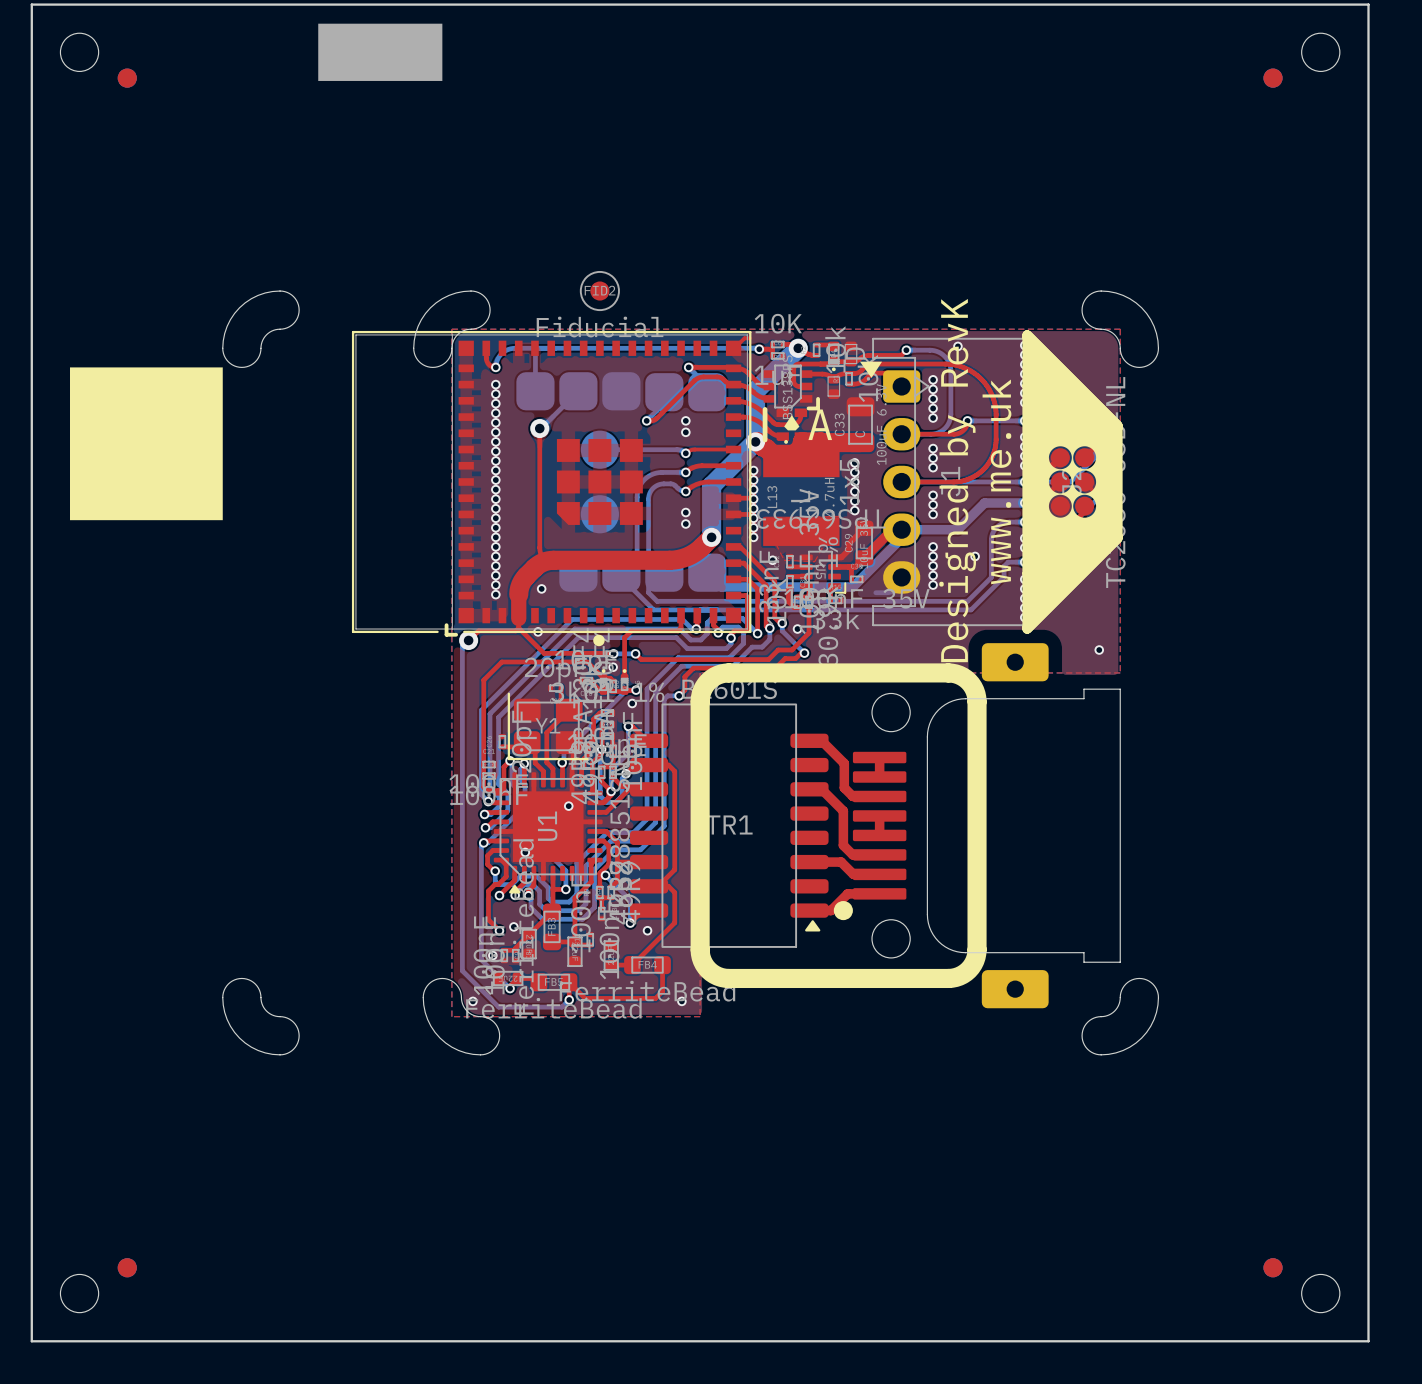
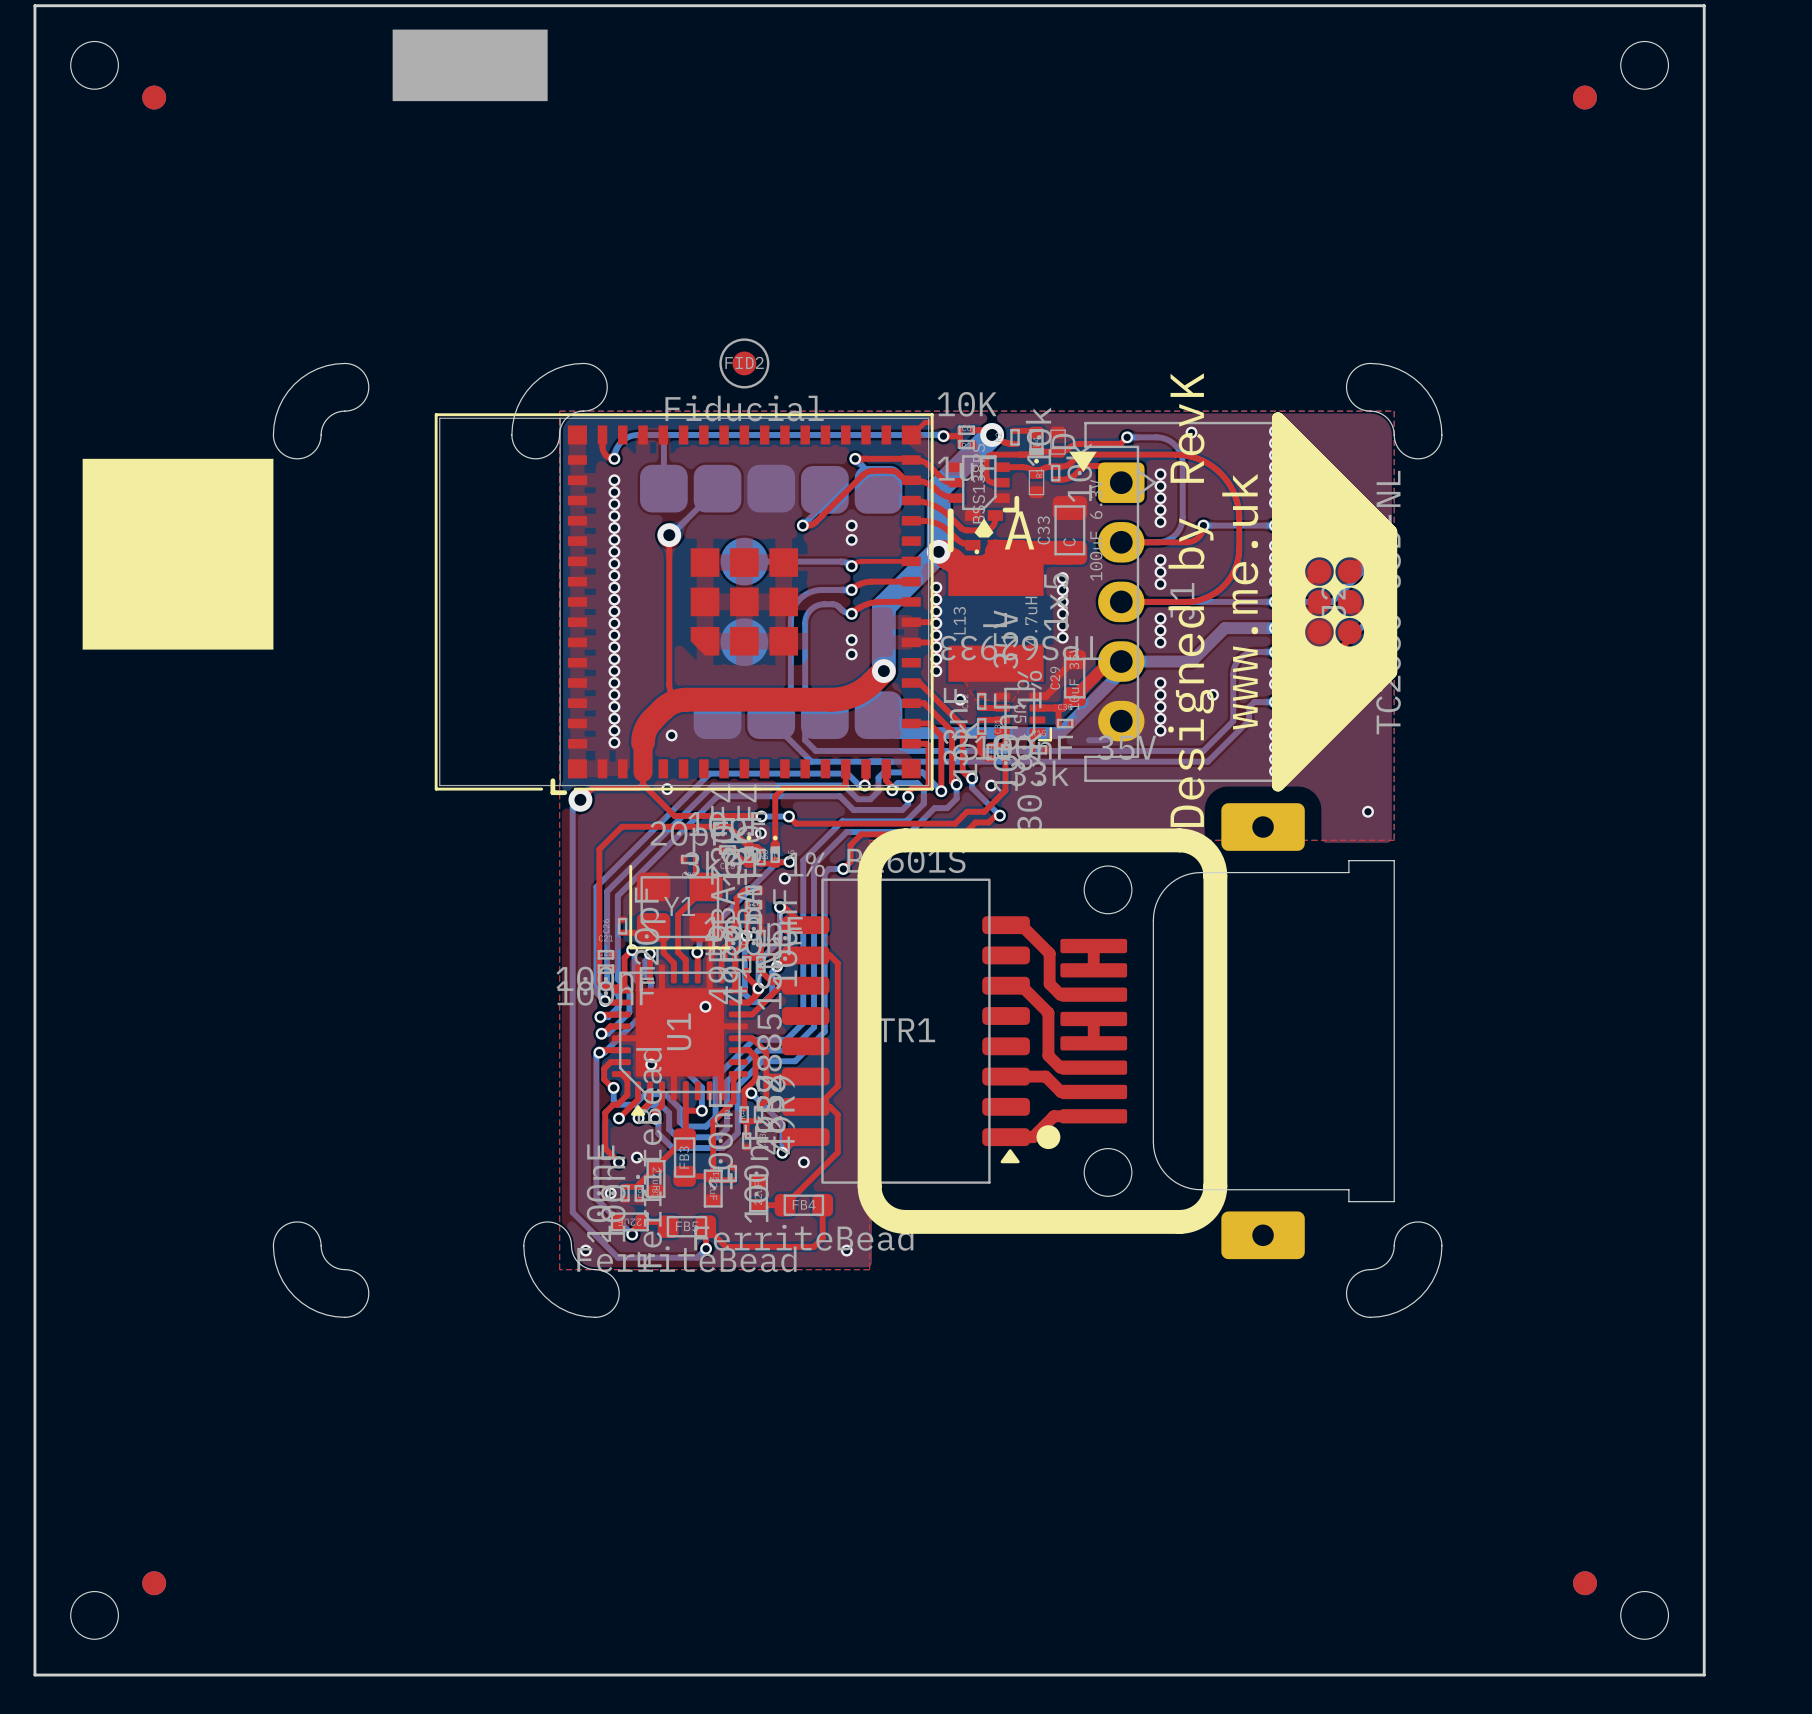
drawing: [593, 634, 605, 647] -> none

